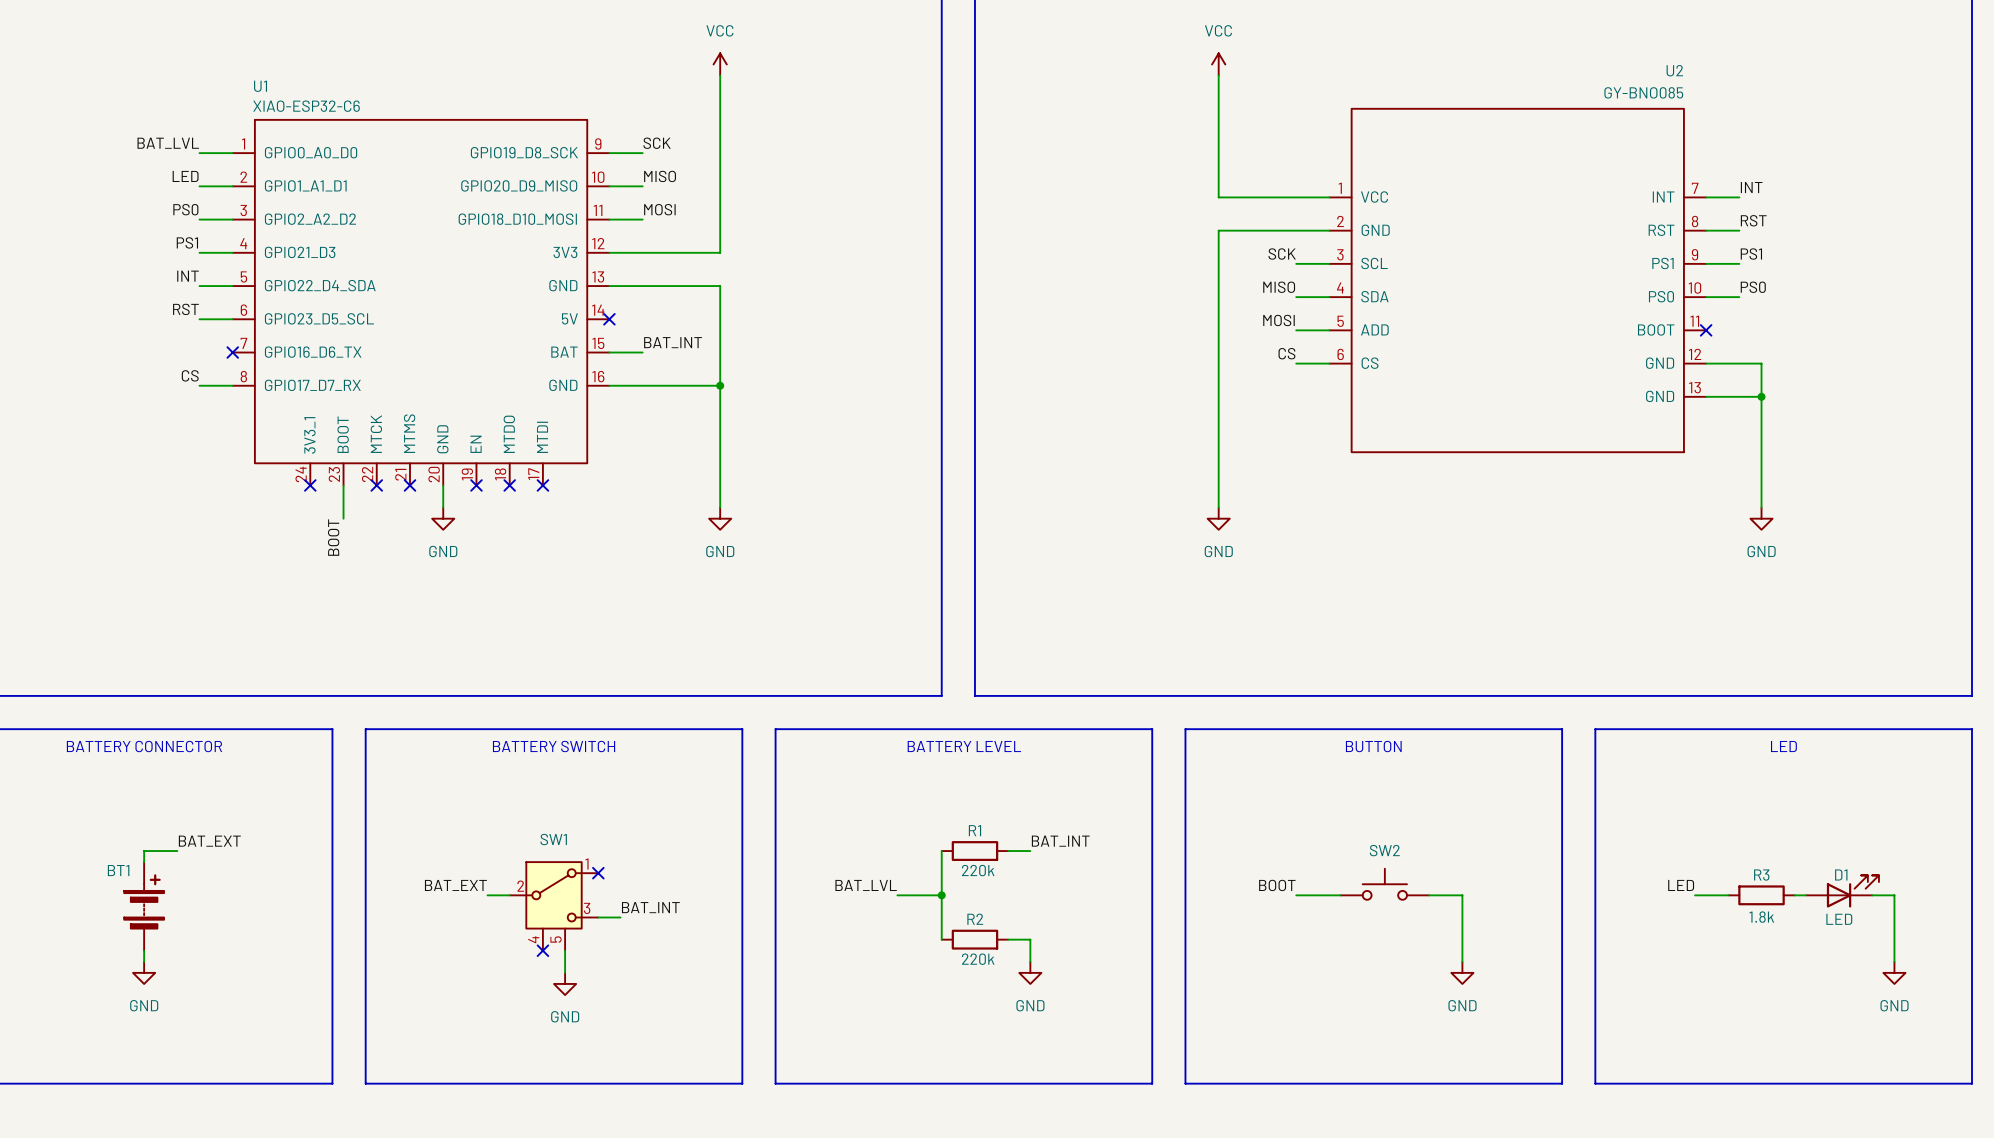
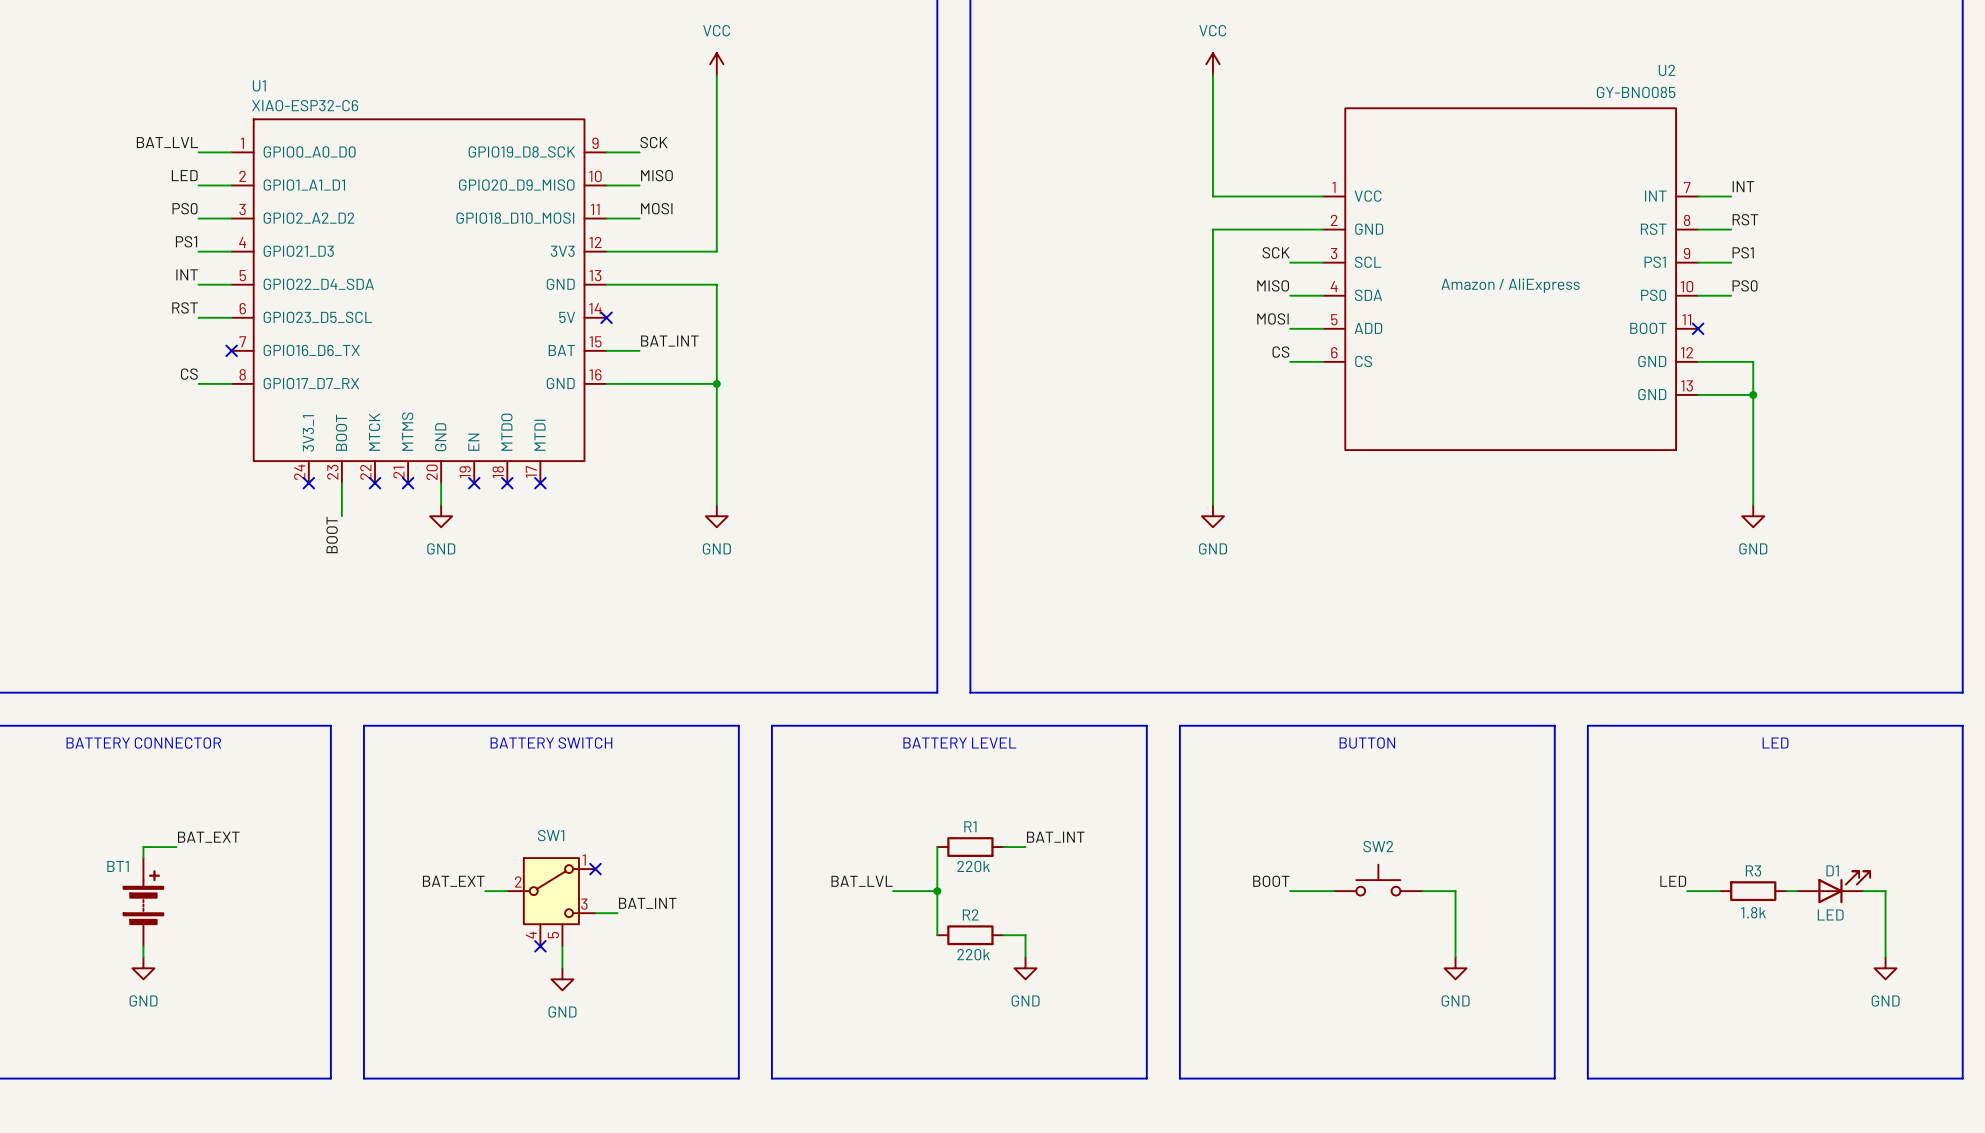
U2 text: none -> Amazon / AliExpress (1510, 285)

